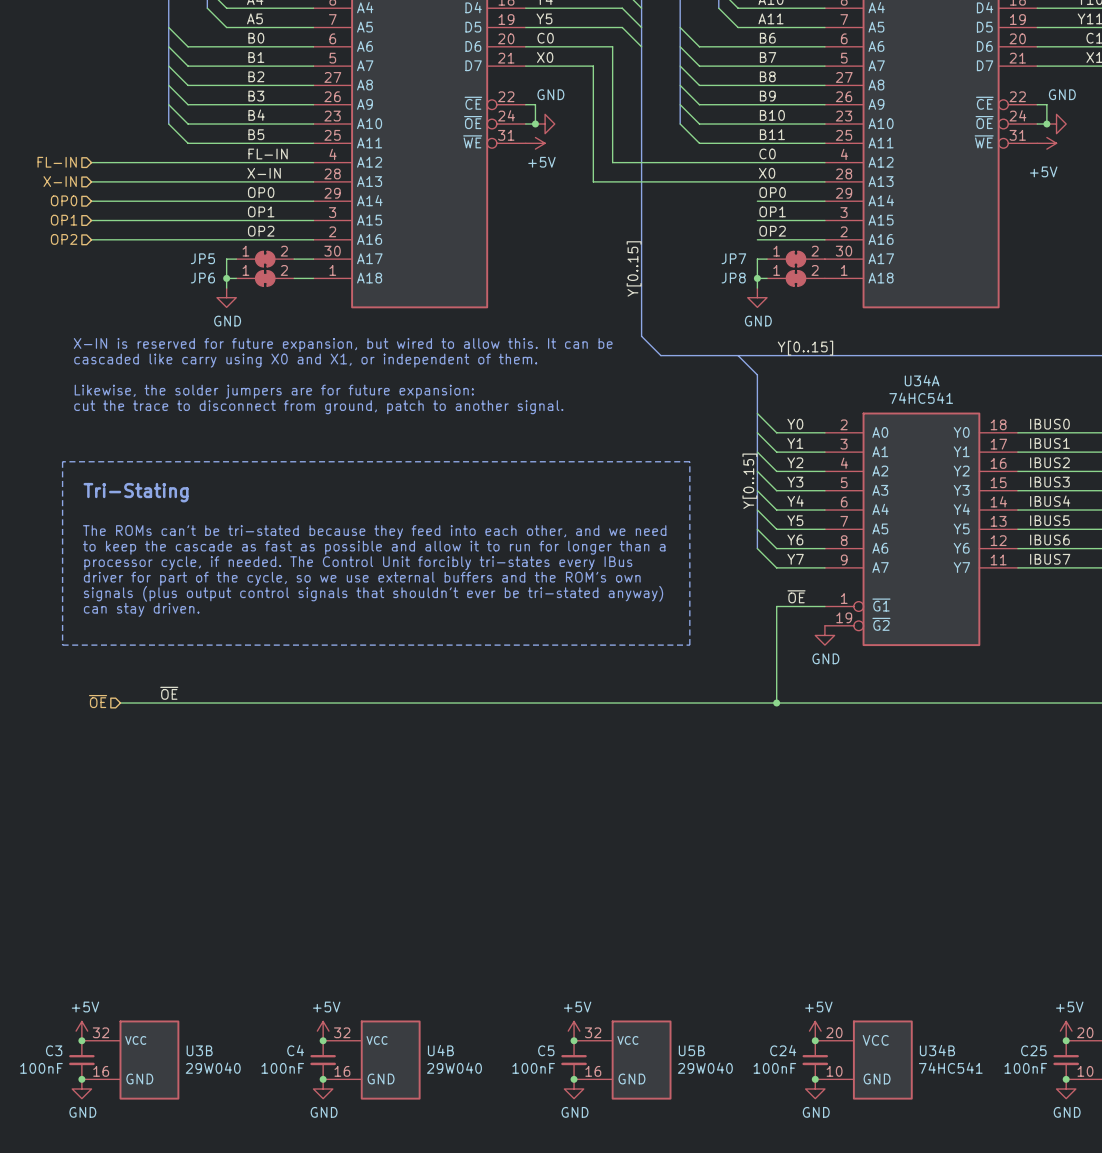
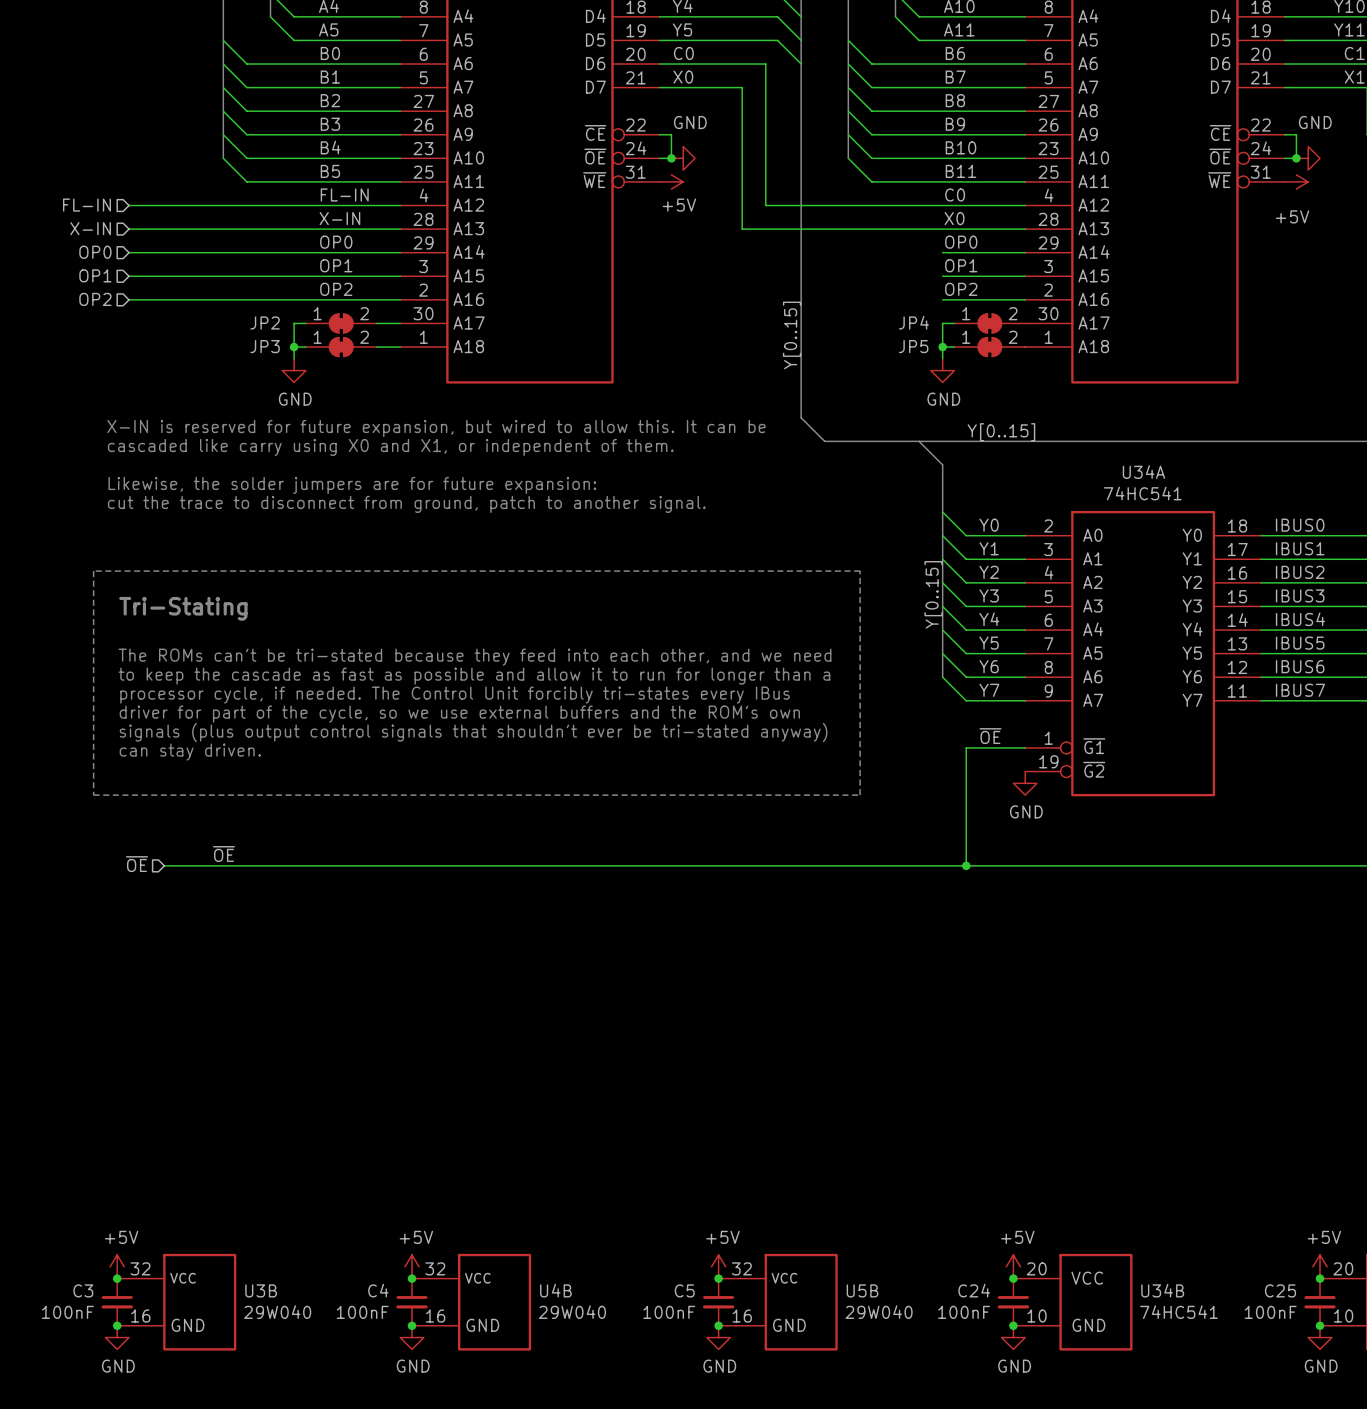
JP5 name: JP5 (202, 258) -> JP2 (265, 323)
JP7 name: JP7 (733, 258) -> JP4 (913, 322)
JP6 name: JP6 (202, 278) -> JP3 (265, 346)
JP8 name: JP8 (733, 278) -> JP5 (913, 346)

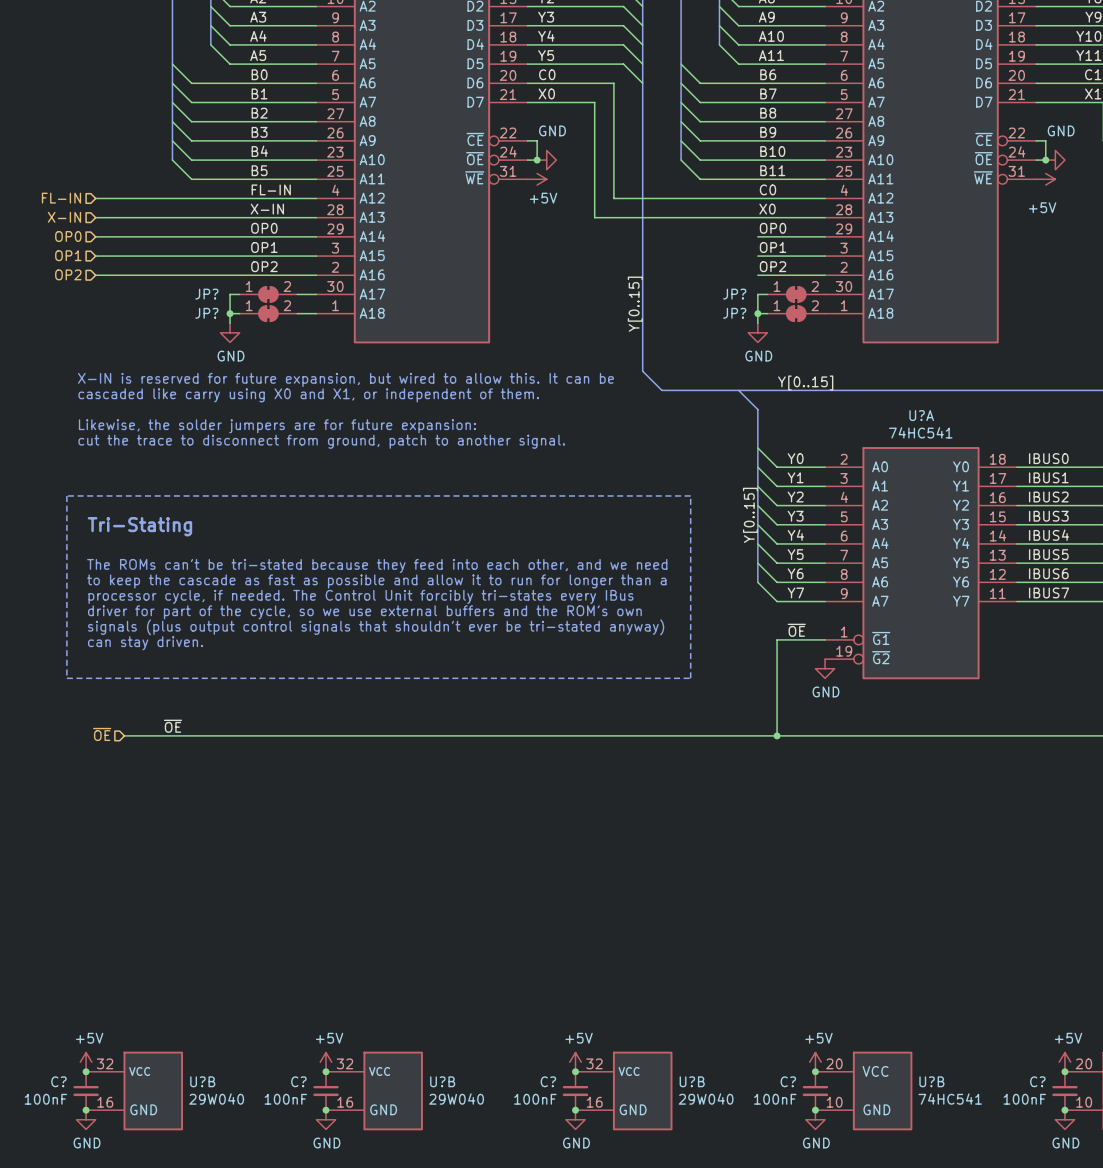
JP4 name: JP4 (913, 322) -> JP? (734, 294)
JP2 name: JP2 (265, 323) -> JP? (206, 294)
JP3 name: JP3 (265, 346) -> JP? (206, 313)
JP5 name: JP5 (913, 346) -> JP? (734, 313)
U34A name: U34A (1143, 472) -> U?A (921, 415)
C3 name: C3 (83, 1290) -> C? (58, 1081)
U3B name: U3B (261, 1290) -> U?B (202, 1081)
C4 name: C4 (378, 1290) -> C? (298, 1081)
U4B name: U4B (555, 1290) -> U?B (442, 1081)
C5 name: C5 (684, 1290) -> C? (548, 1081)
U5B name: U5B (862, 1290) -> U?B (692, 1081)
C24 name: C24 (974, 1290) -> C? (788, 1081)
U34B name: U34B (1162, 1290) -> U?B (931, 1081)
C25 name: C25 (1280, 1290) -> C? (1037, 1081)

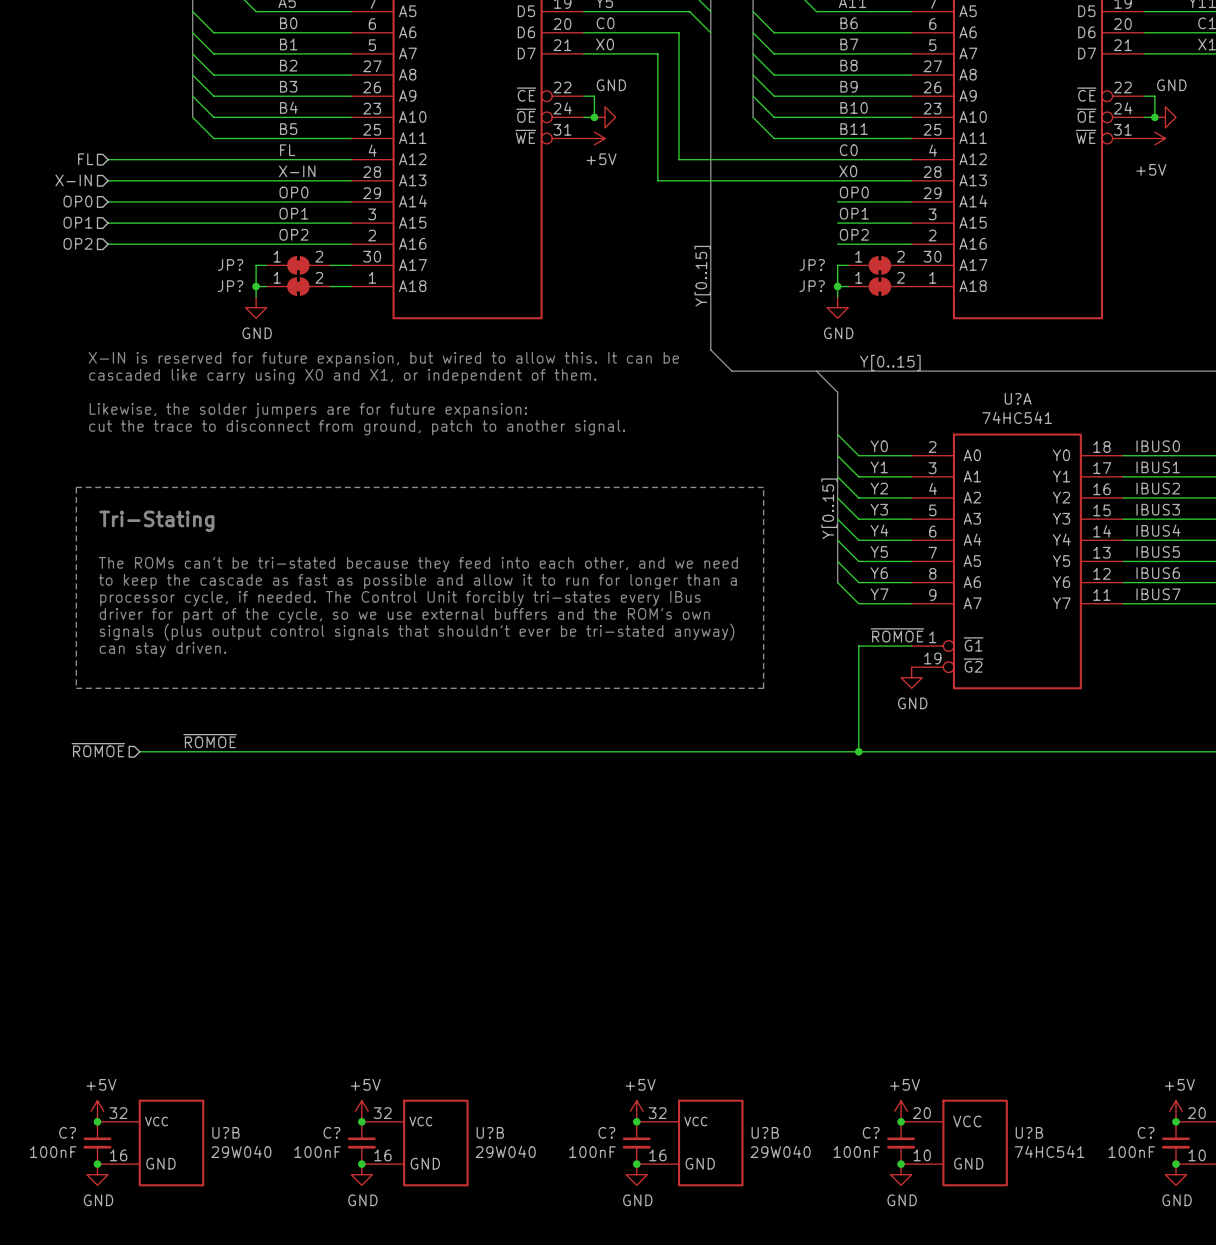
label: FL-IN (271, 189) -> FL (287, 150)
hierarchical label: FL-IN (61, 198) -> FL (85, 159)
label: ~{OE} (796, 630) -> ~{ROMOE} (897, 635)
label: ~{OE} (172, 726) -> ~{ROMOE} (210, 741)
hierarchical label: ~{OE} (102, 734) -> ~{ROMOE} (98, 750)

